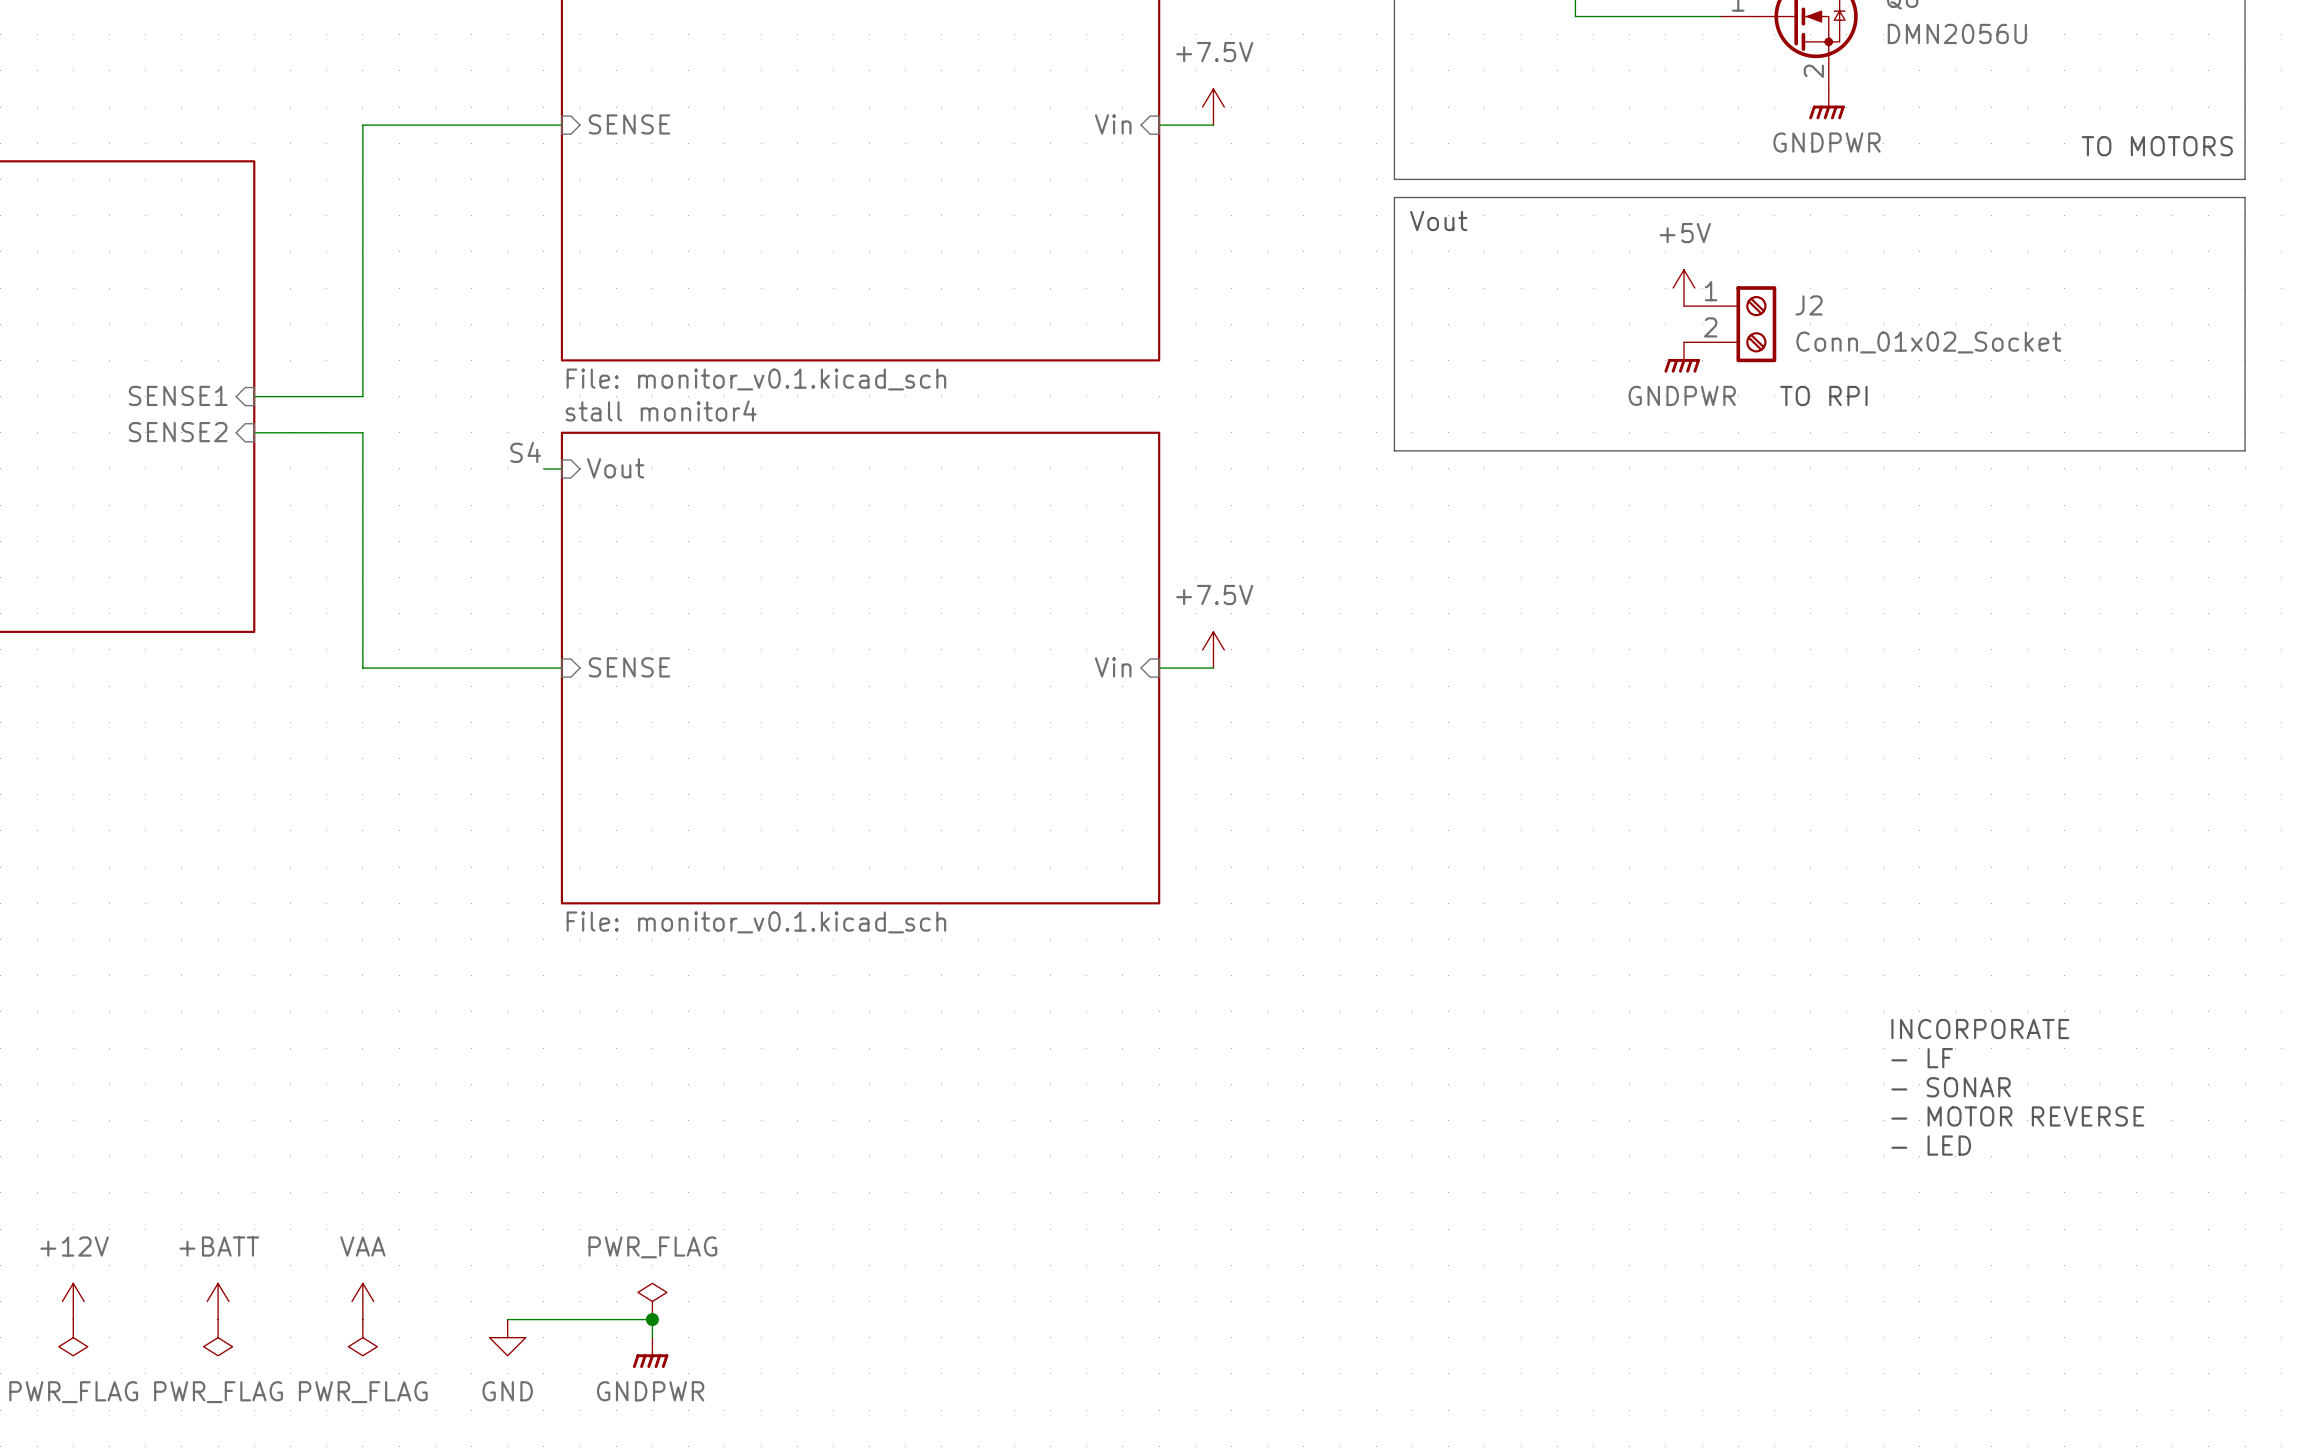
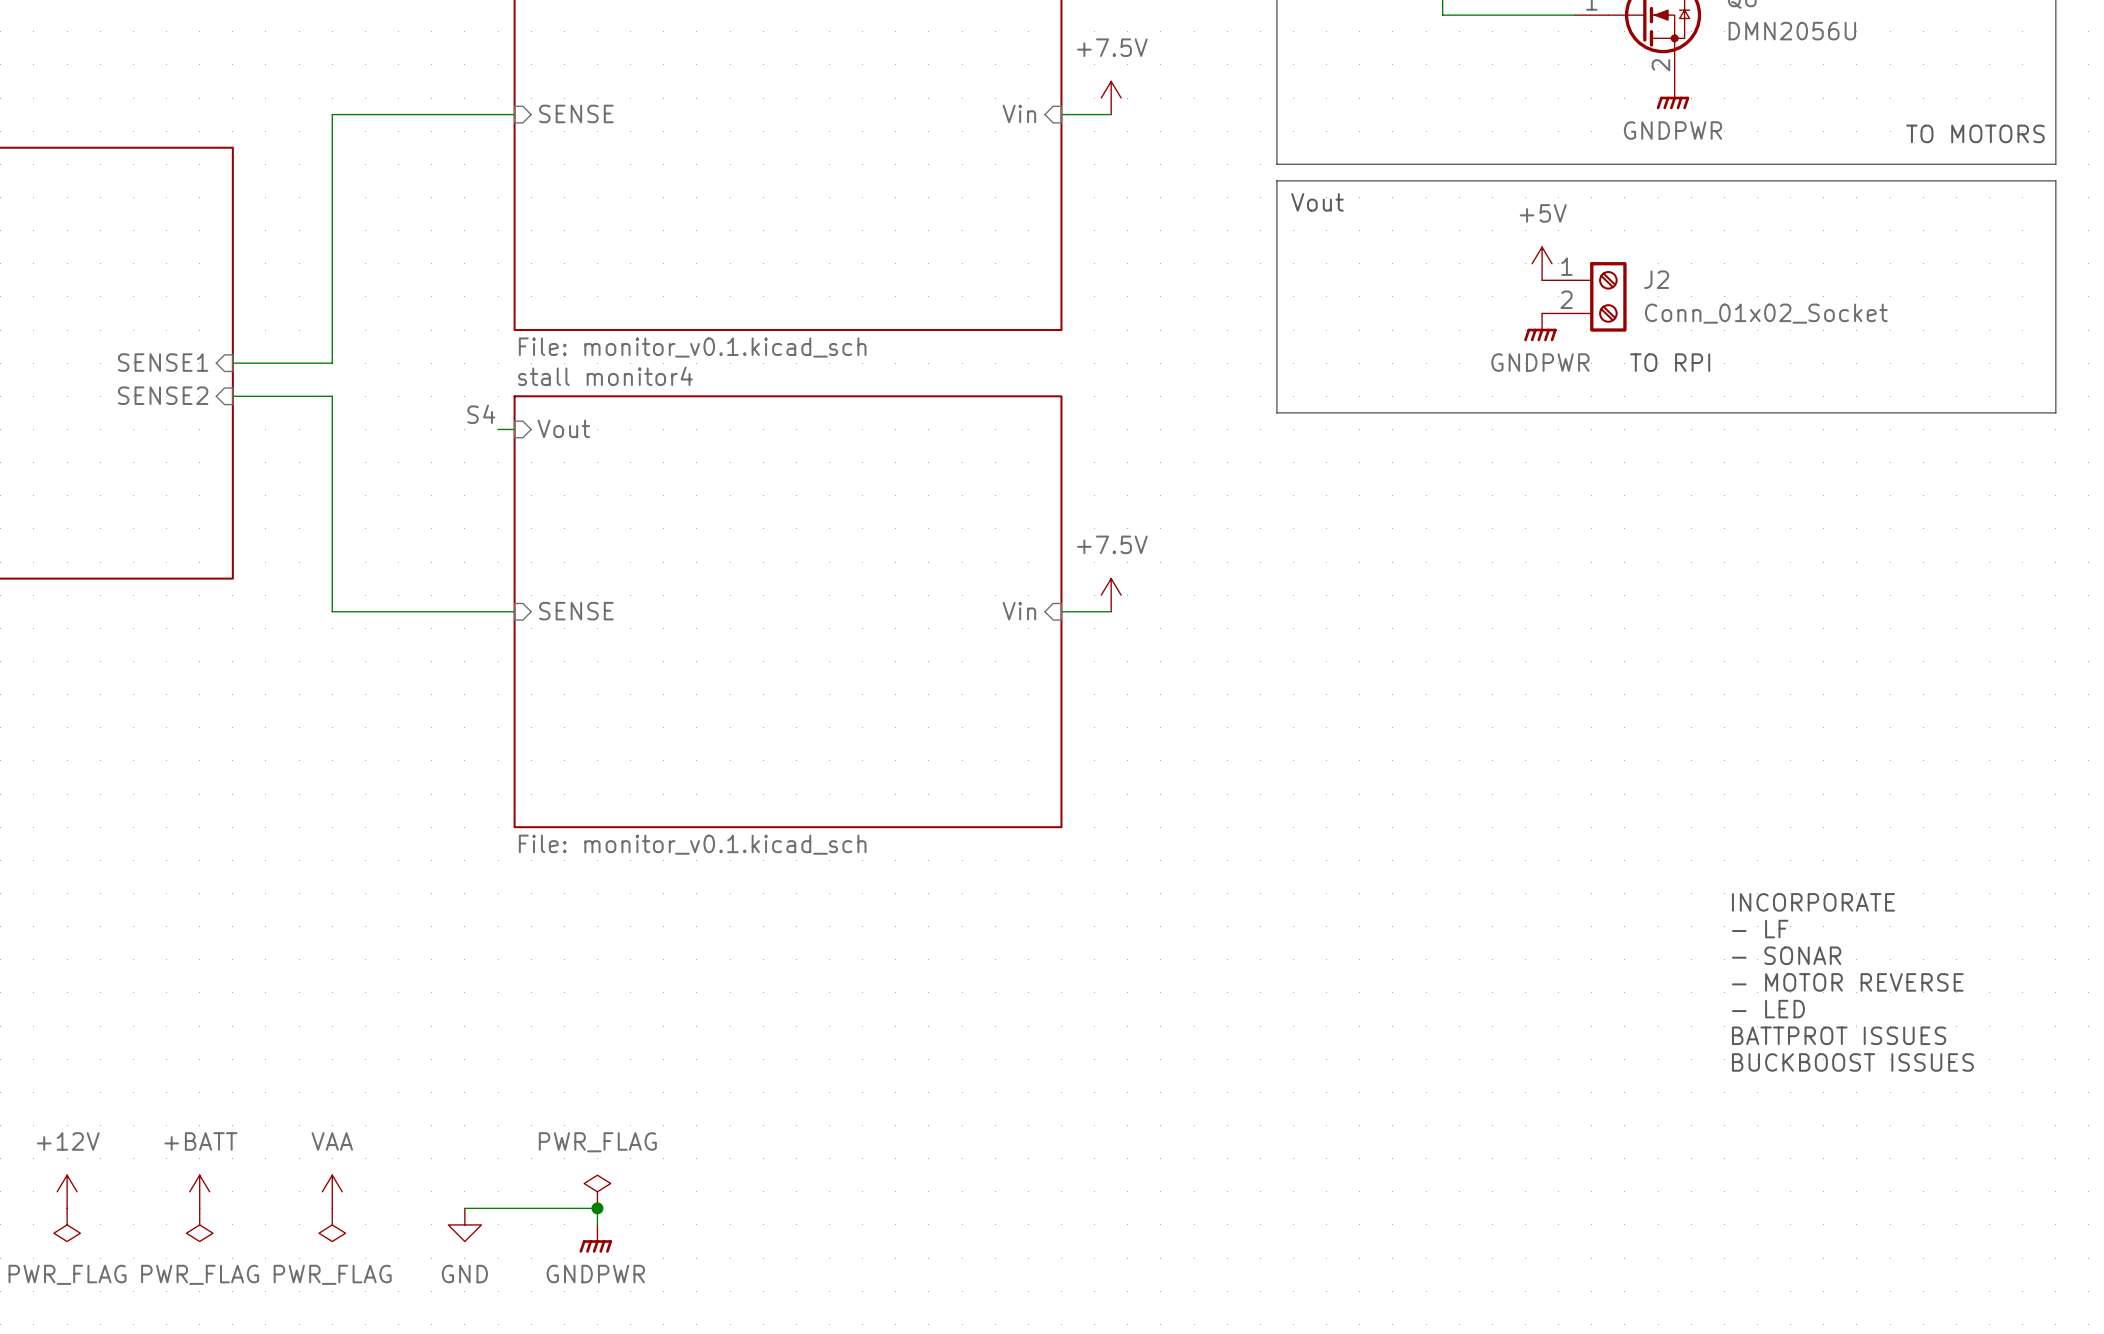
text position: INCORPORATE (1980, 1029) -> INCORPORATE (1813, 902)
text position: - LF (1922, 1058) -> - LF (1760, 929)
text position: - SONAR (1951, 1087) -> - SONAR (1786, 955)
text position: - MOTOR REVERSE (2017, 1116) -> - MOTOR REVERSE (1847, 982)
text: none -> BATTPROT ISSUES (1839, 1035)
text position: - LED (1931, 1145) -> - LED (1768, 1009)
text: none -> BUCKBOOST ISSUES (1852, 1062)

